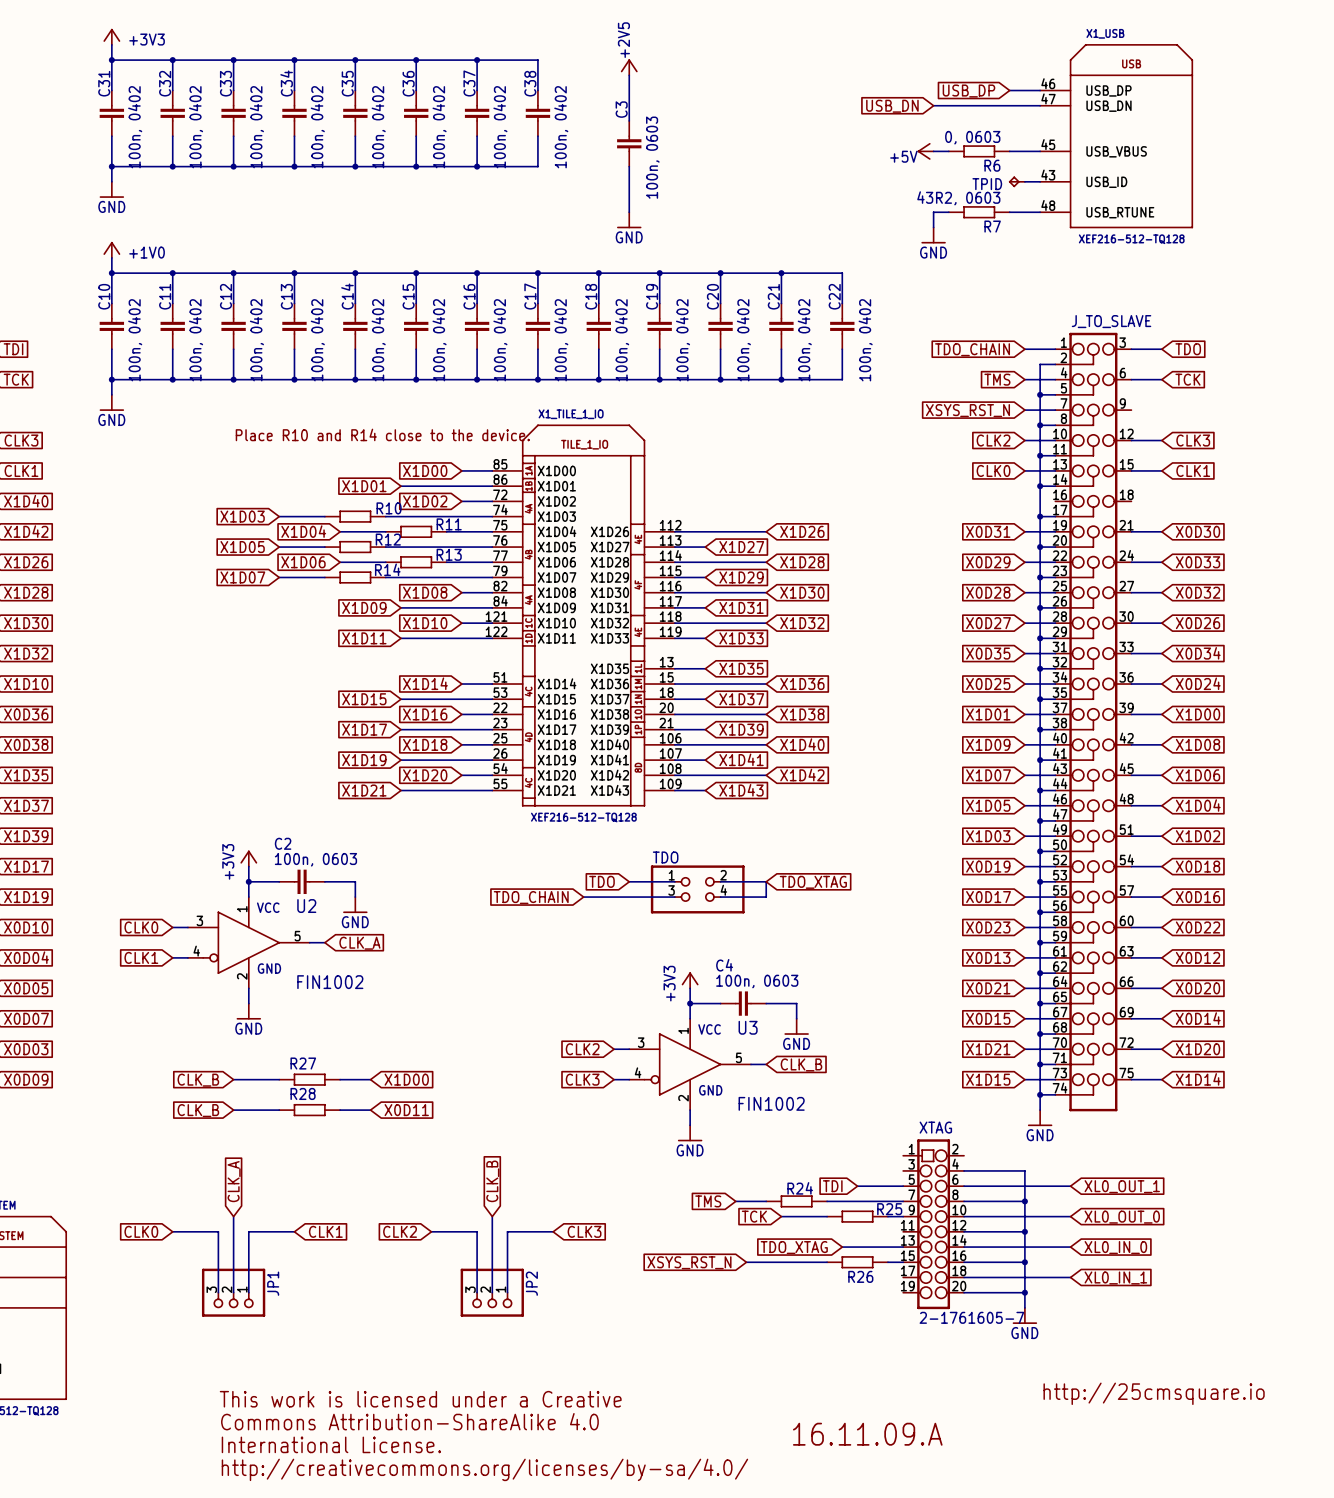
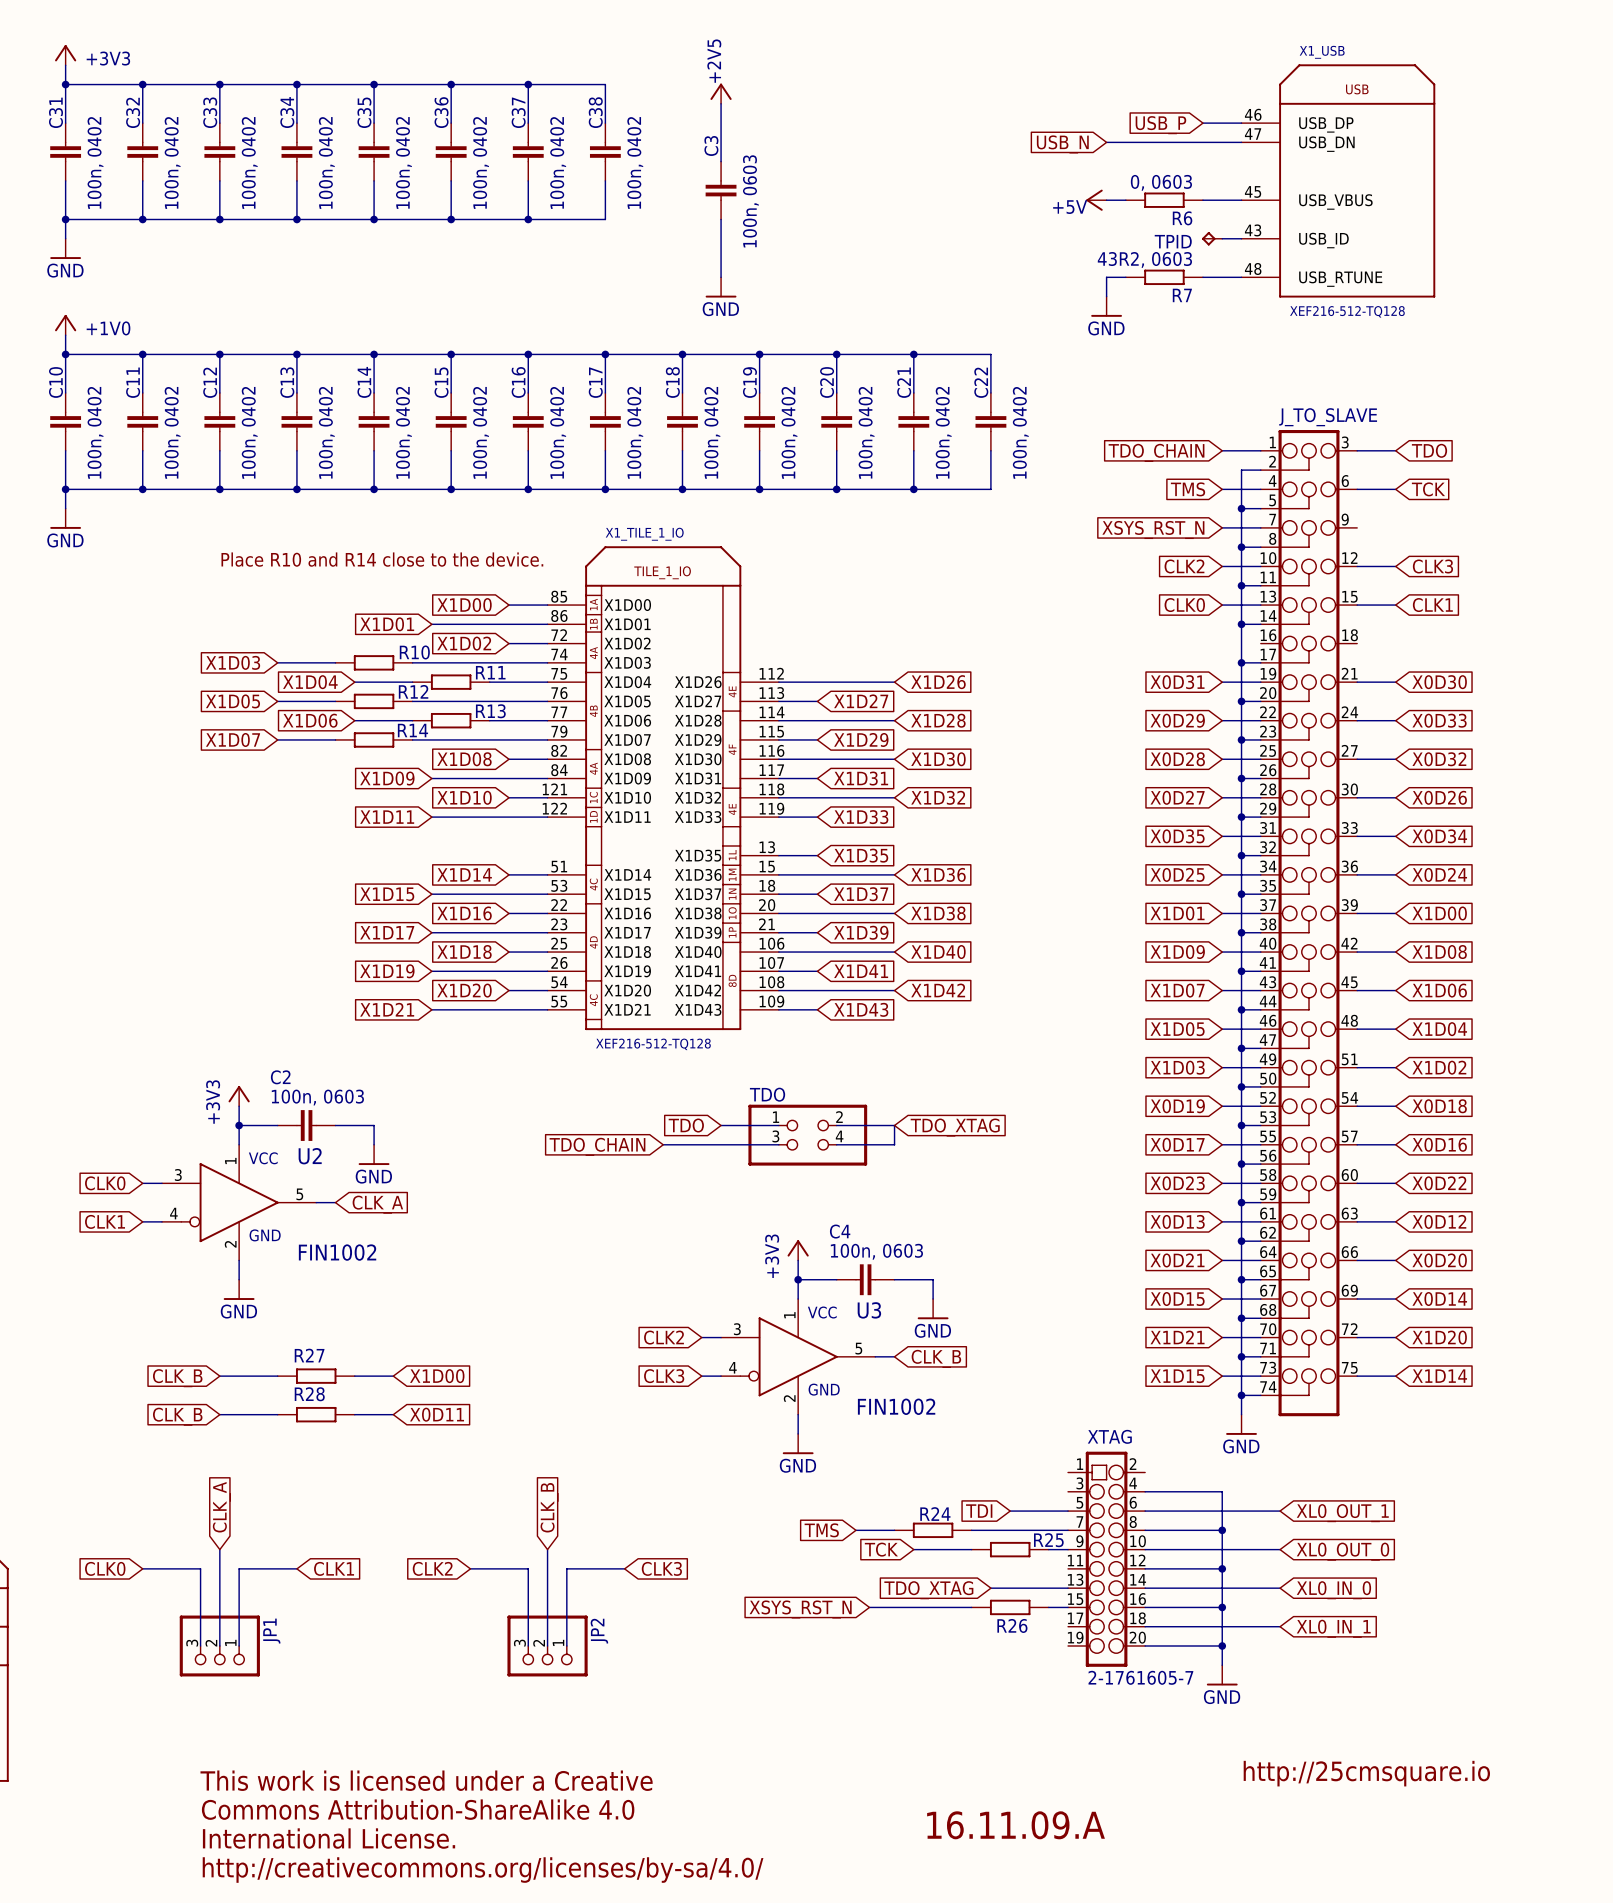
global label: USB_DP (968, 91) -> USB_P (1160, 125)
global label: USB_DN (892, 106) -> USB_N (1062, 144)

